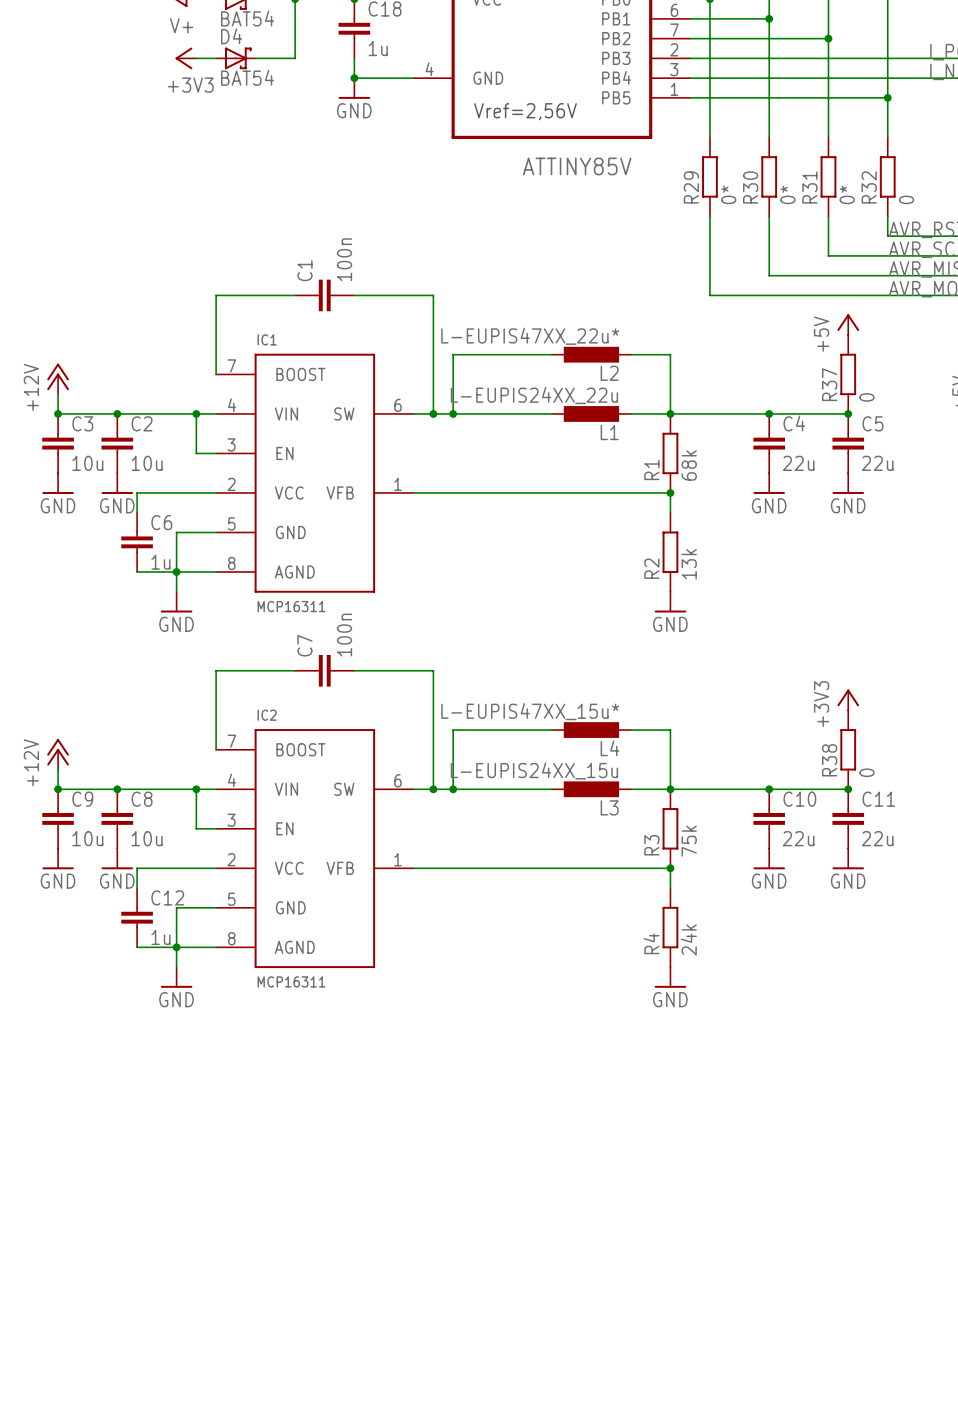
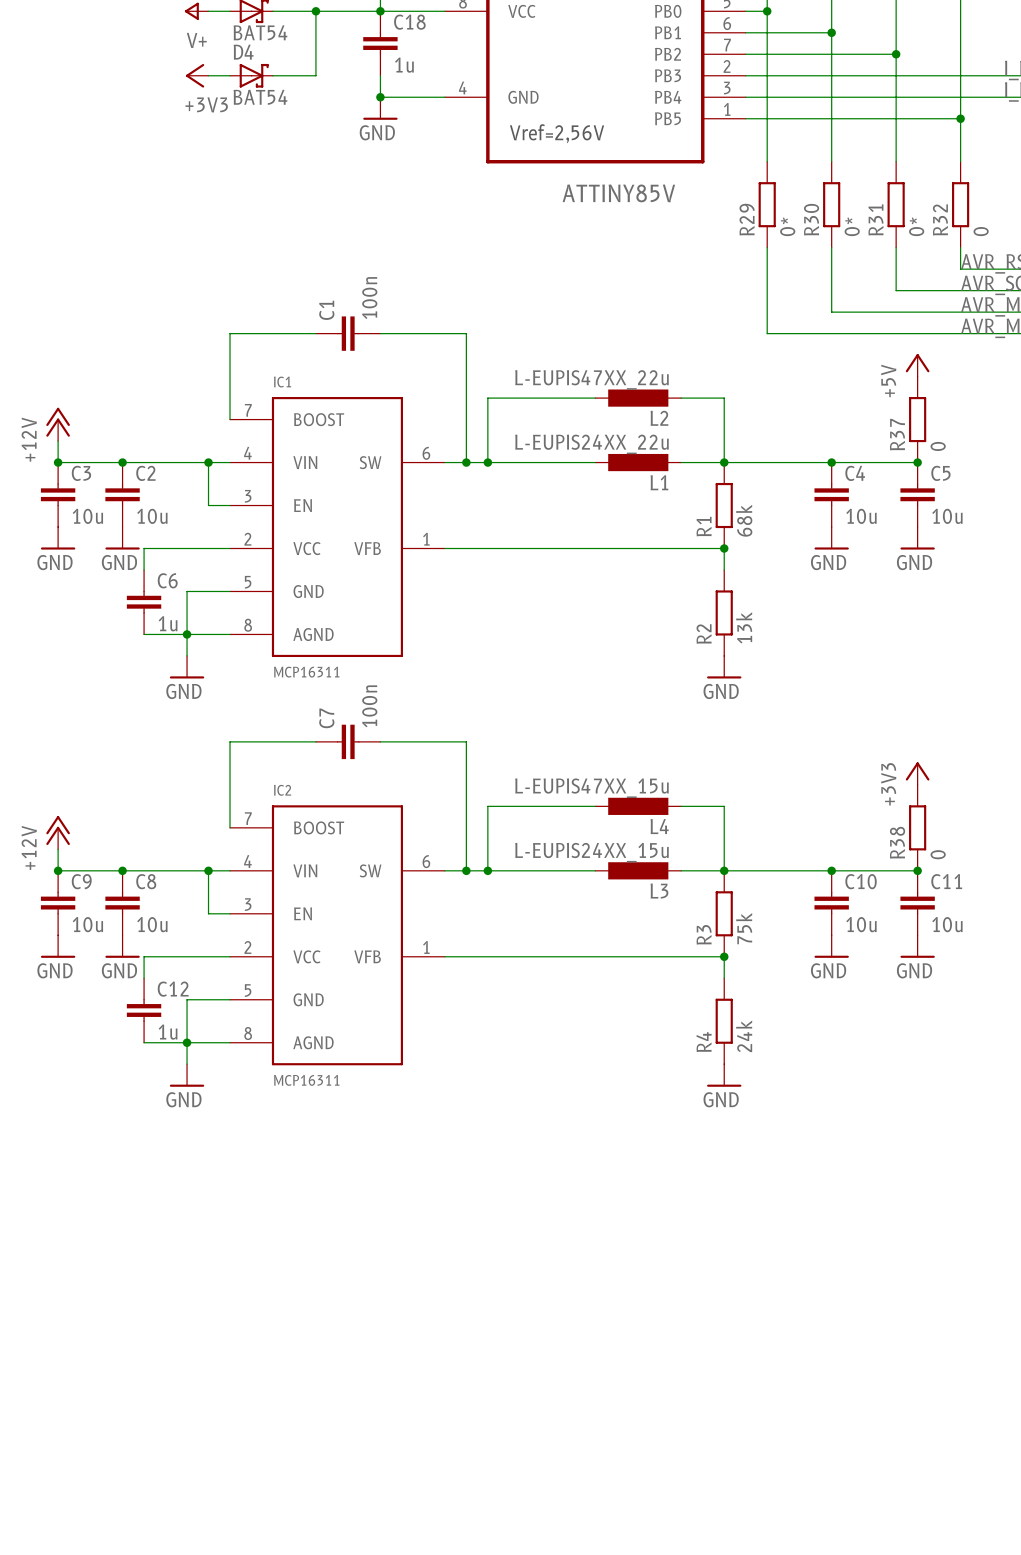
L2 value: L-EUPIS47XX_22u* (530, 336) -> L-EUPIS47XX_22u (591, 379)
C4 value: 22u (798, 463) -> 10u (861, 516)
C5 value: 22u (877, 463) -> 10u (947, 516)
L4 value: L-EUPIS47XX_15u* (530, 711) -> L-EUPIS47XX_15u (591, 788)
C10 value: 22u (798, 838) -> 10u (861, 924)
C11 value: 22u (877, 838) -> 10u (947, 924)

